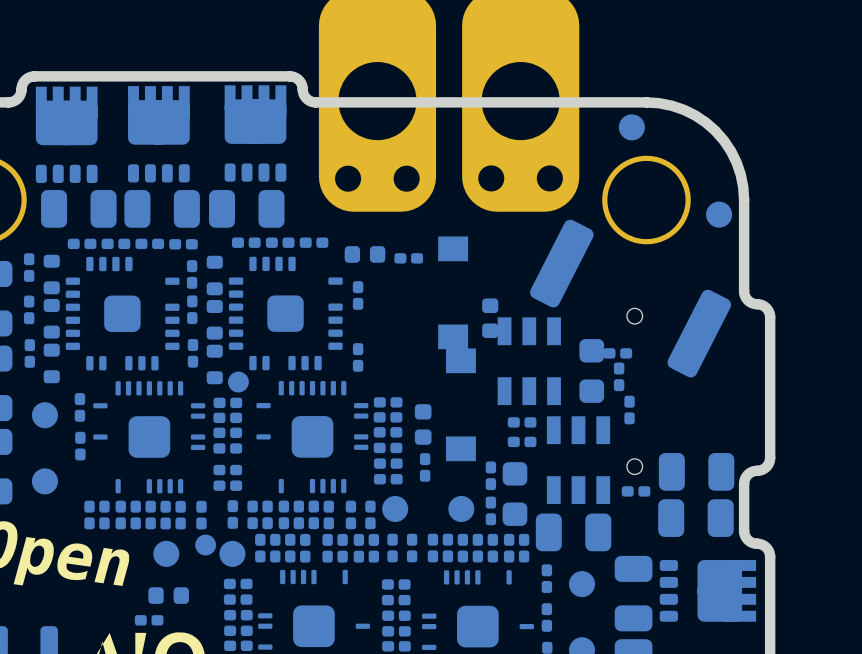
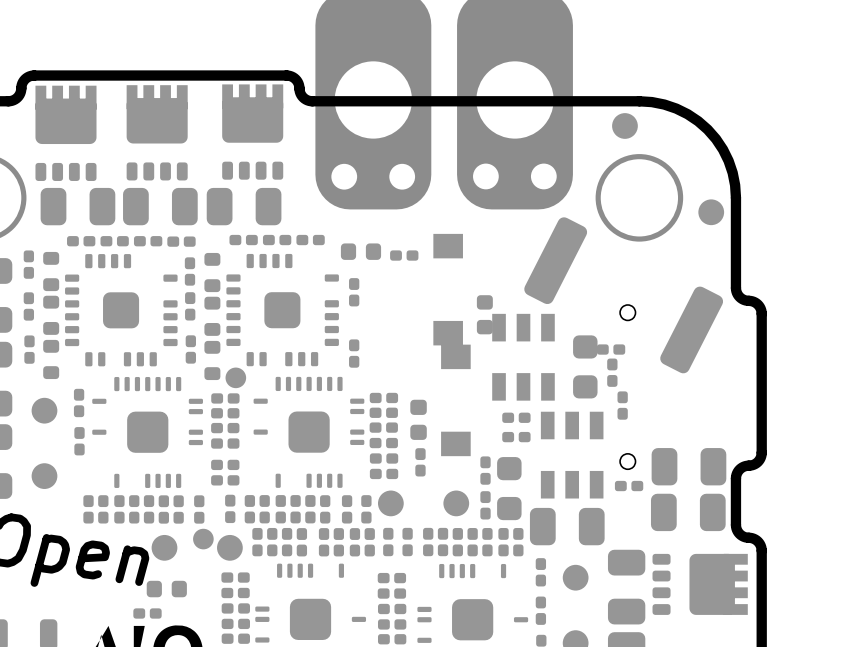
part footprint: [224, 85, 287, 182] -> [222, 84, 284, 180]
part footprint: [35, 86, 98, 183] -> [35, 85, 97, 181]
part footprint: [128, 86, 190, 183] -> [126, 85, 188, 181]
part footprint: [659, 560, 757, 622] -> [652, 553, 748, 615]

